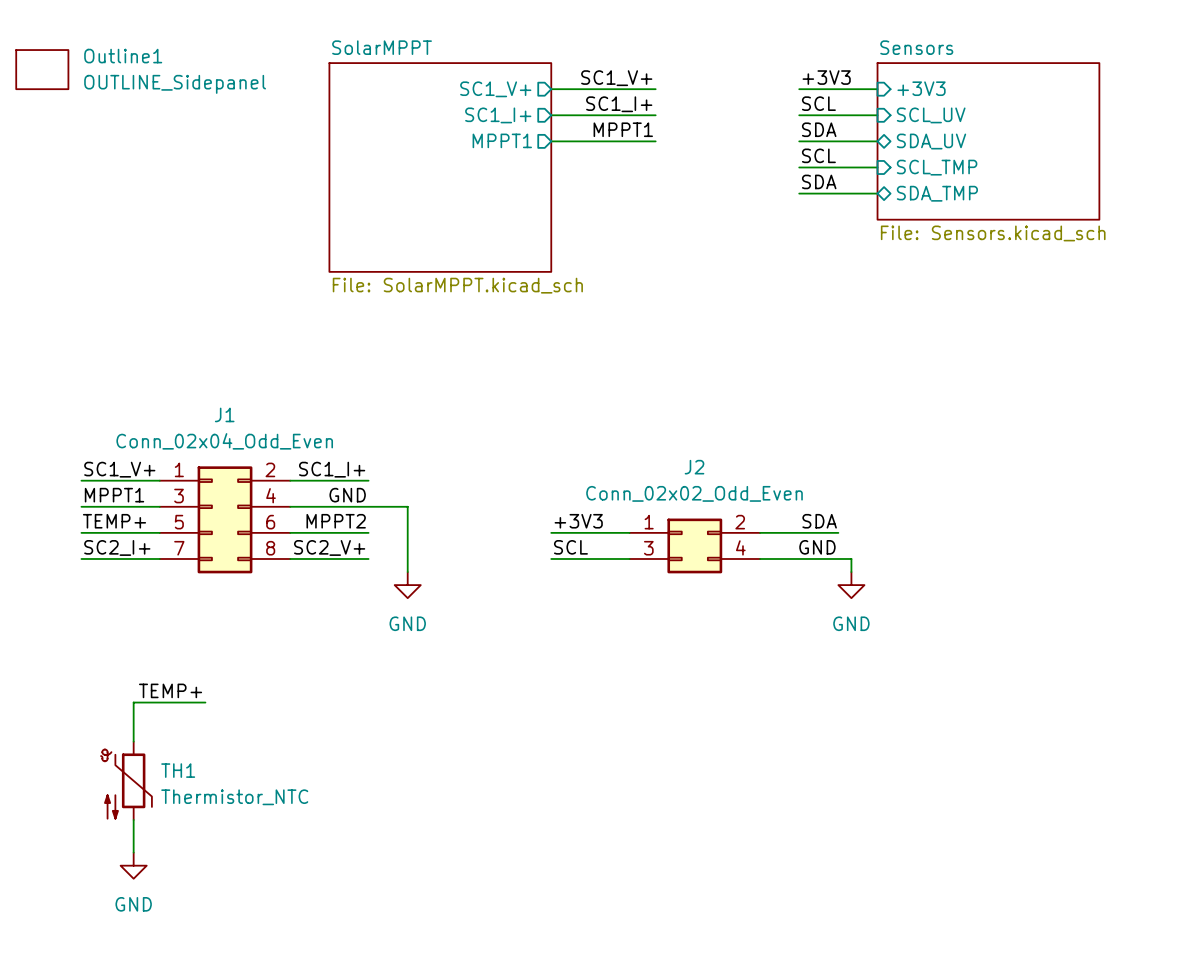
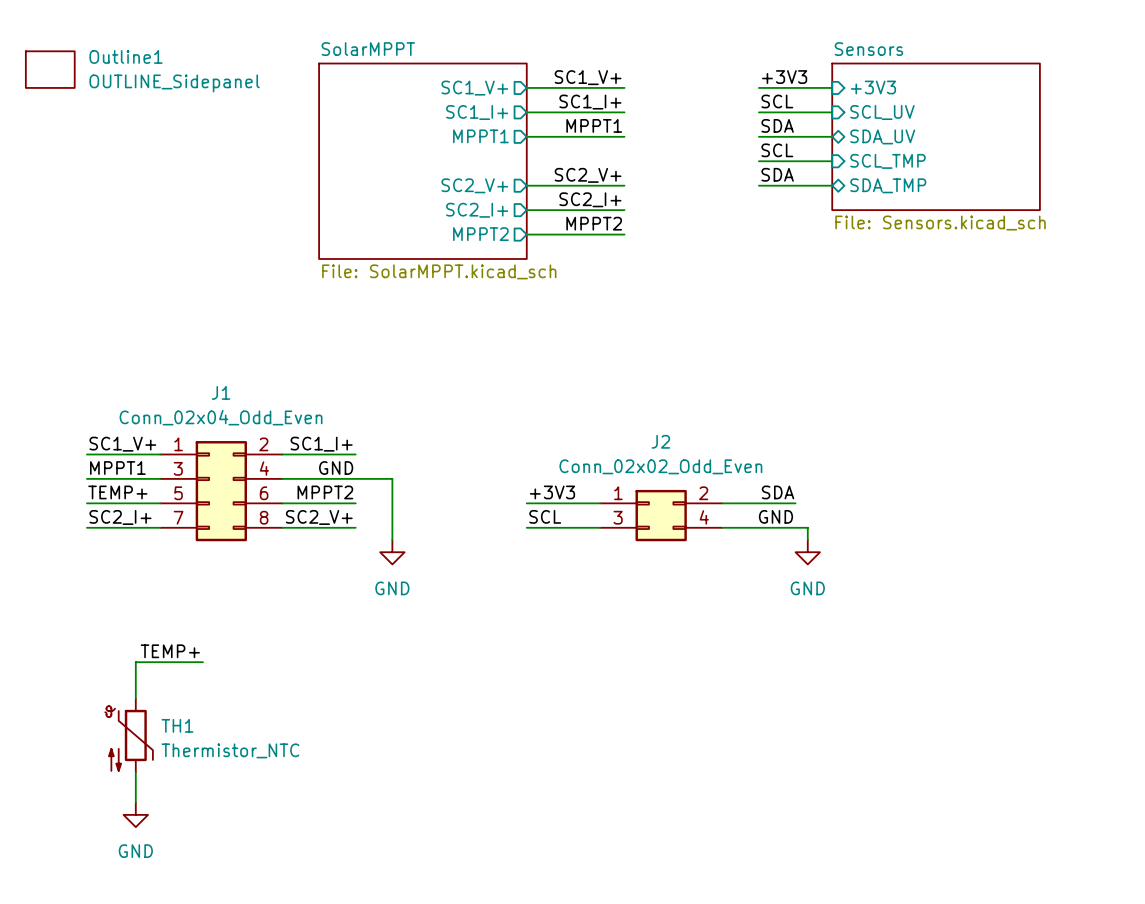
label: none -> SC2_V+ (588, 175)
sheet pin: none -> SC2_V+ (474, 185)
wire: none -> (526, 185) (624, 185)
label: none -> SC2_I+ (590, 199)
sheet pin: none -> SC2_I+ (477, 210)
wire: none -> (526, 210) (624, 210)
label: none -> MPPT2 (594, 223)
sheet pin: none -> MPPT2 (480, 234)
wire: none -> (526, 234) (624, 234)

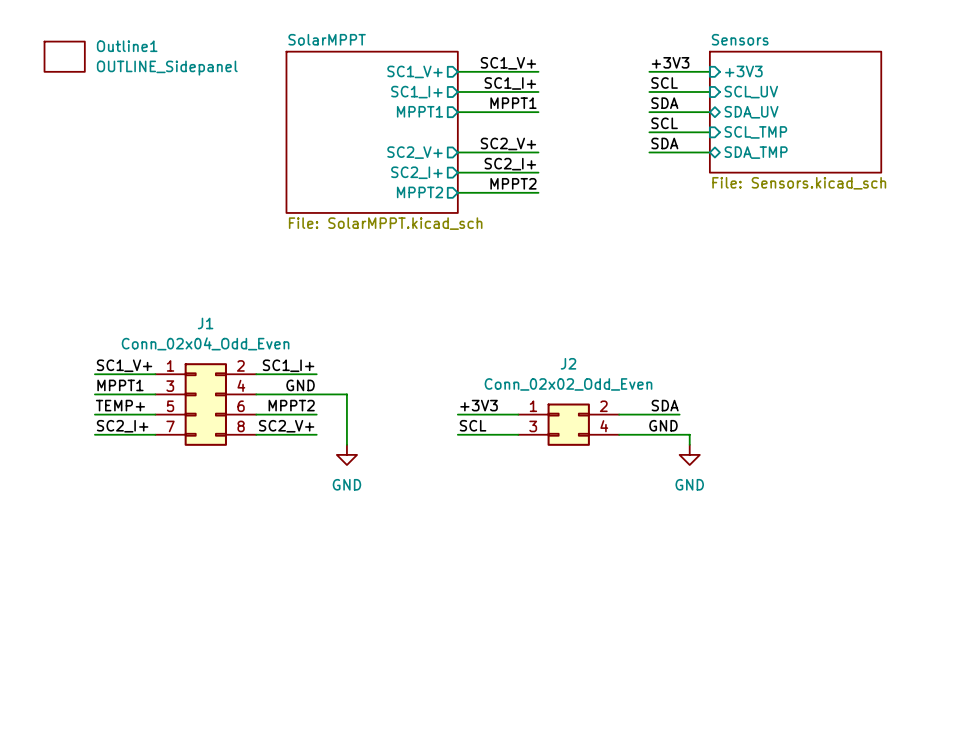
label: TEMP+ (170, 651) -> none
wire: (203, 662) (135, 662) (135, 698) -> none
TH1: Thermistor_NTC (129, 735) -> none
wire: (135, 772) (135, 802) -> none
power symbol: GND (135, 814) -> none

